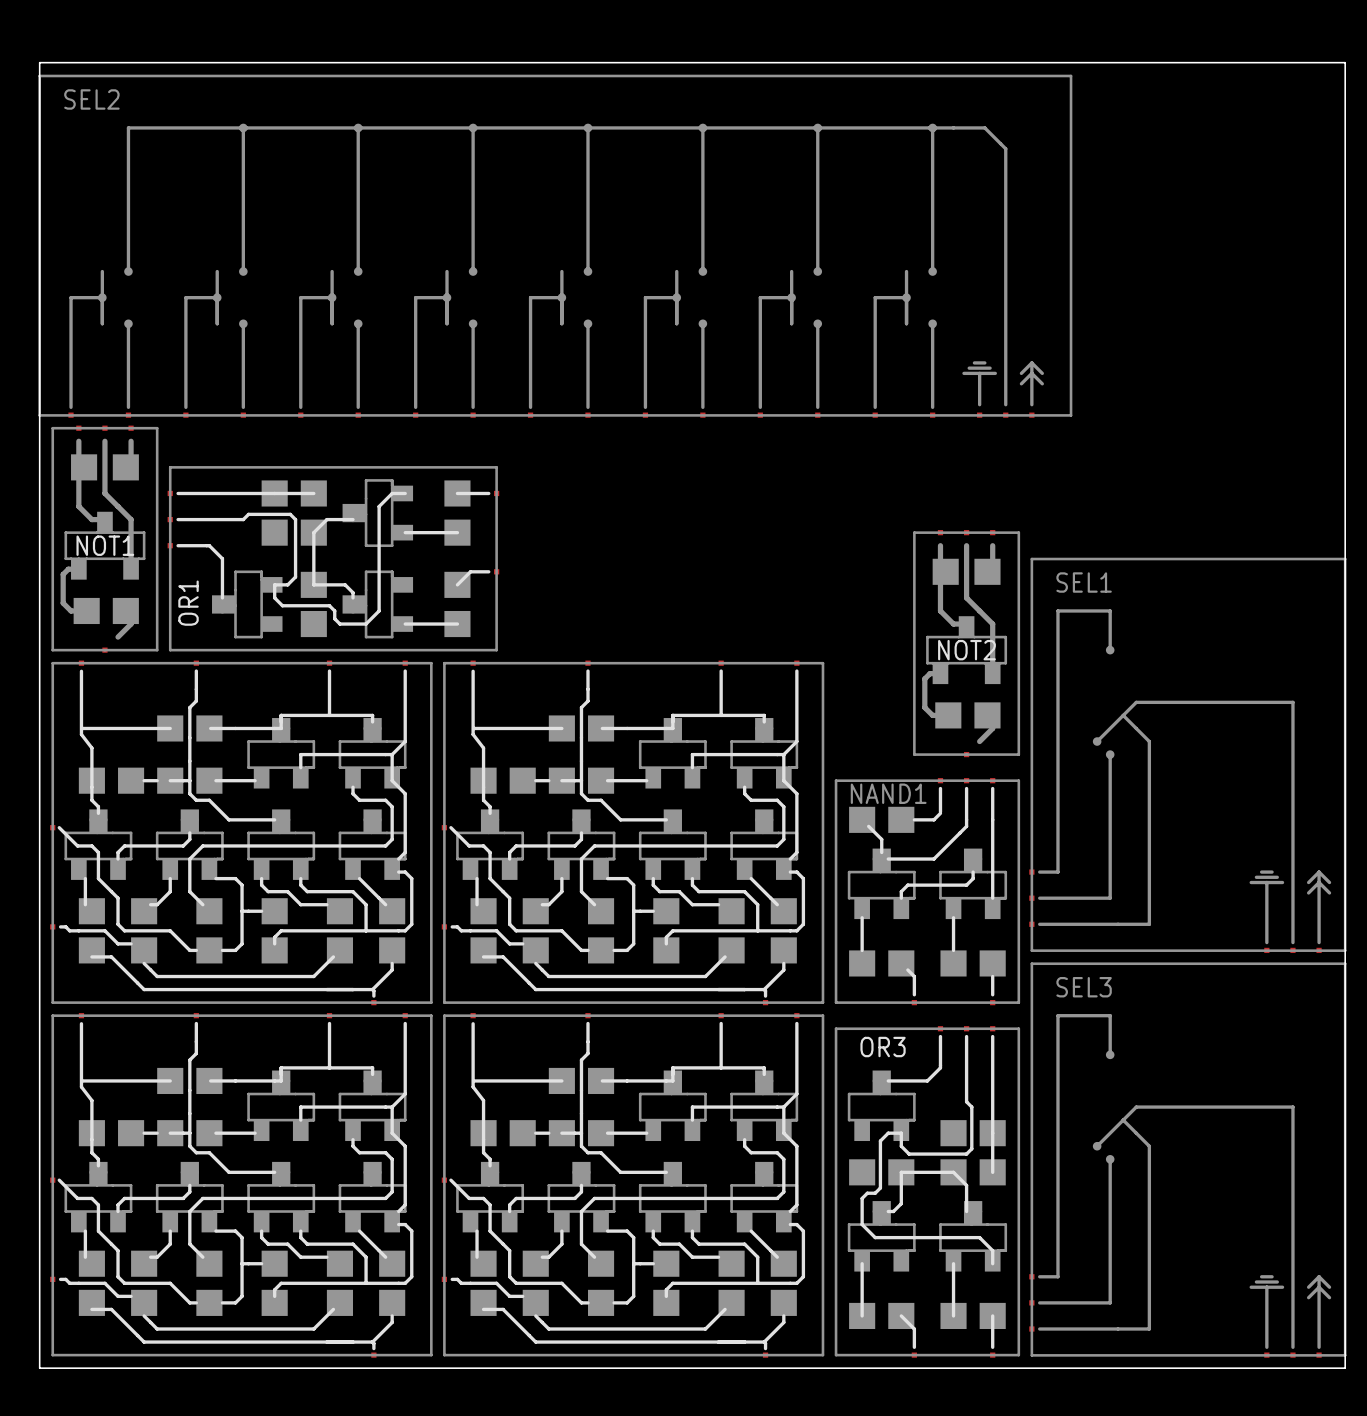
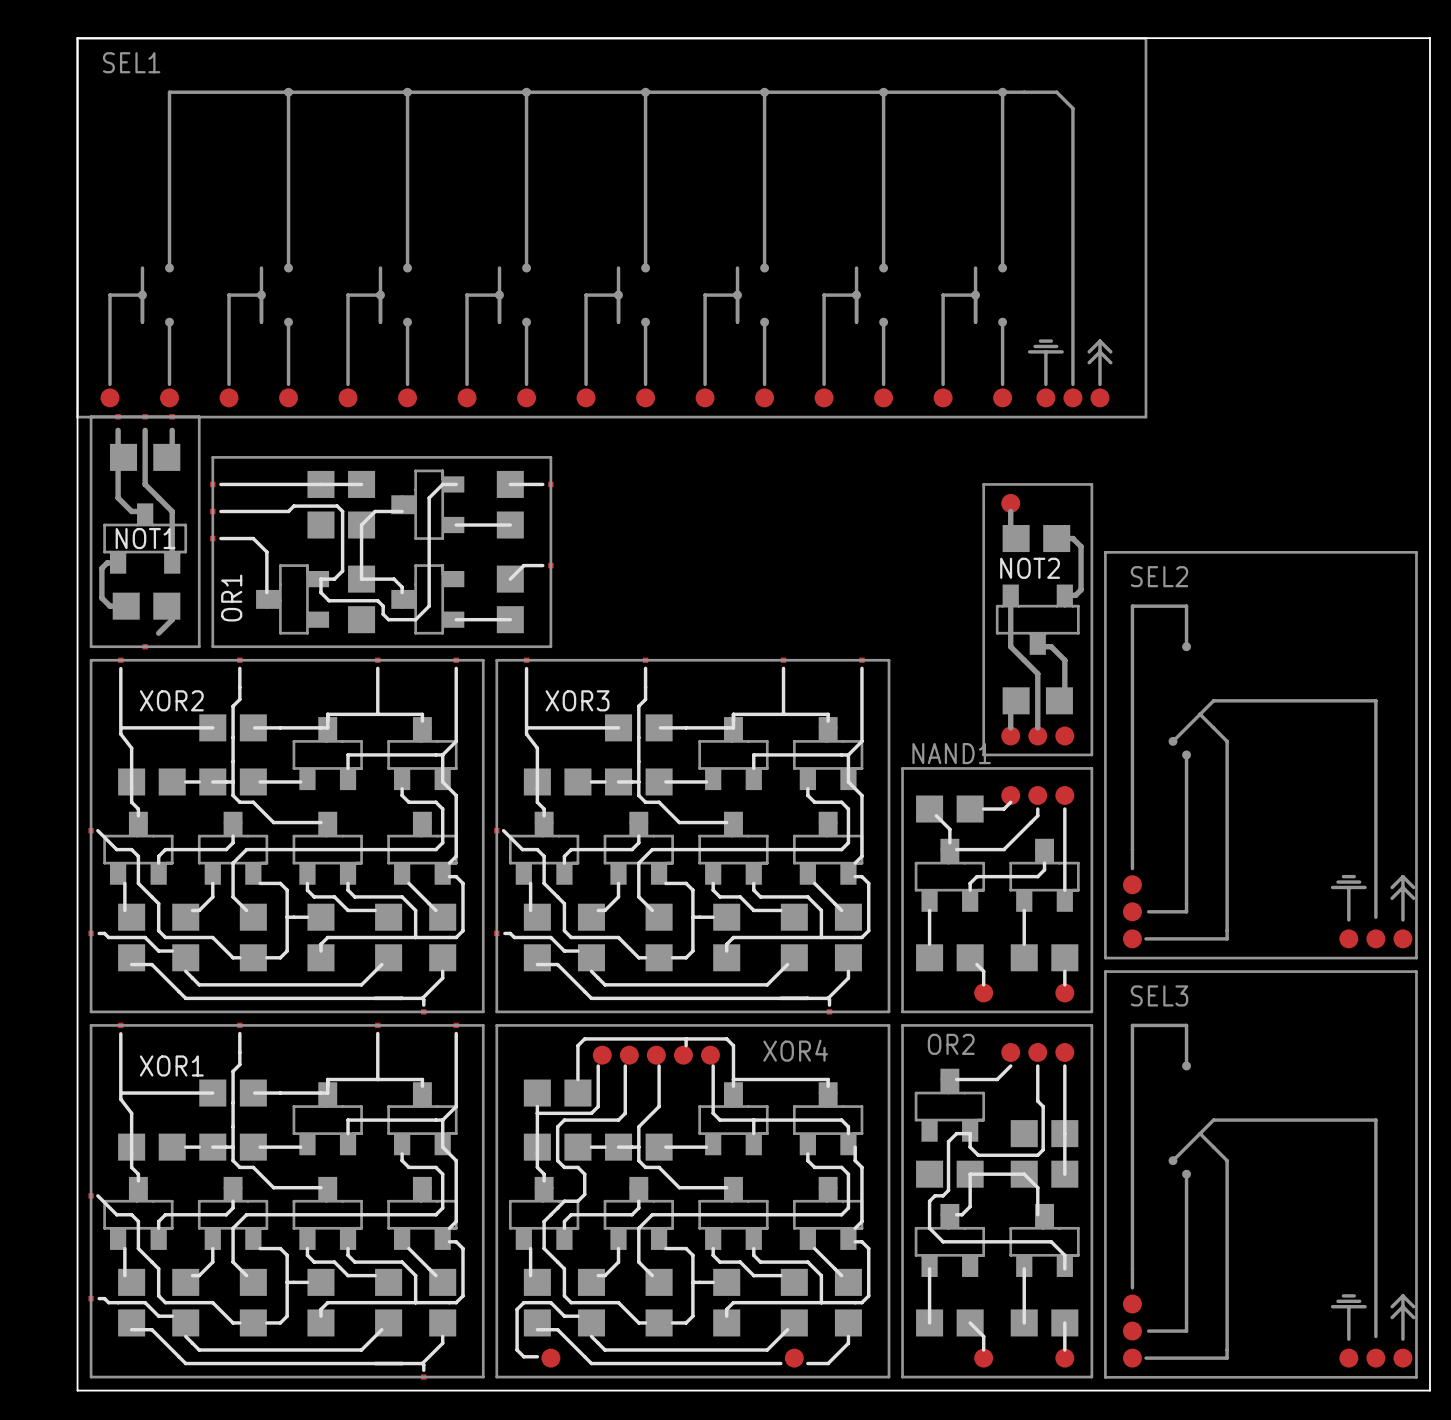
SEL2 footprint: [38, 74, 1073, 418] -> [1104, 550, 1418, 960]
SEL2 name position: SEL2 (91, 99) -> SEL2 (1159, 576)
NOT2 footprint: [913, 530, 1021, 758] -> [982, 483, 1094, 757]
SEL1 footprint: [1029, 557, 1347, 954] -> [76, 37, 1148, 419]
SEL1 name position: SEL1 (1084, 582) -> SEL1 (131, 62)
NOT2 name position: NOT2 (966, 650) -> NOT2 (1030, 568)
XOR2 name: none -> XOR2 (171, 700)
XOR3 name: none -> XOR3 (577, 700)
NAND1 footprint: [834, 778, 1021, 1006] -> [901, 767, 1094, 1014]
NAND1 name position: NAND1 (888, 793) -> NAND1 (951, 753)
SEL3 footprint: [1029, 962, 1347, 1358] -> [1104, 970, 1418, 1379]
XOR1 name: none -> XOR1 (171, 1065)
part: (633, 1185) -> none
XOR4: none -> (692, 1201)
OR2: none -> (997, 1201)
OR3: (927, 1191) -> none

